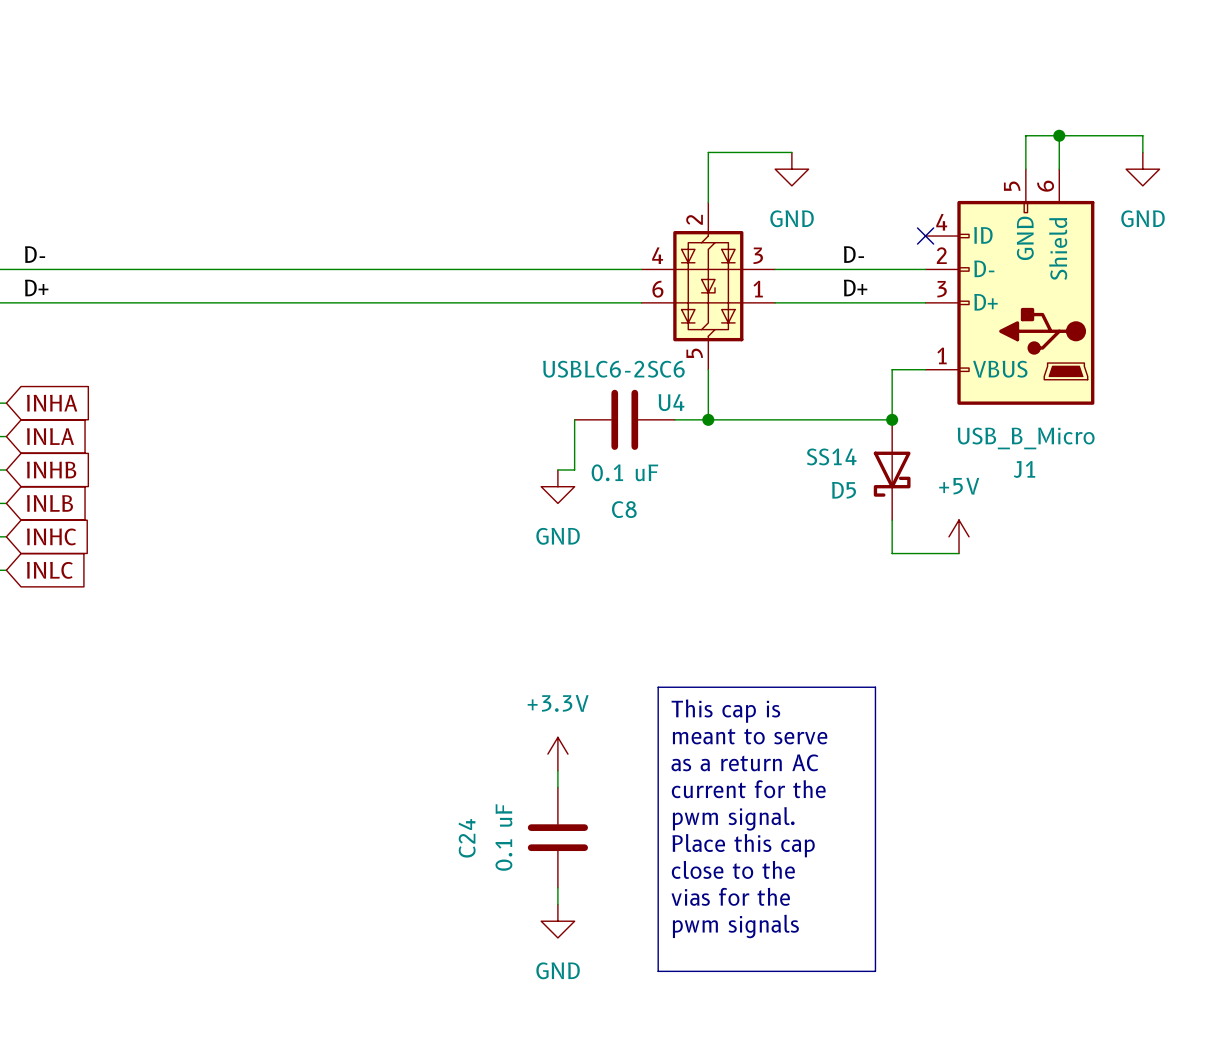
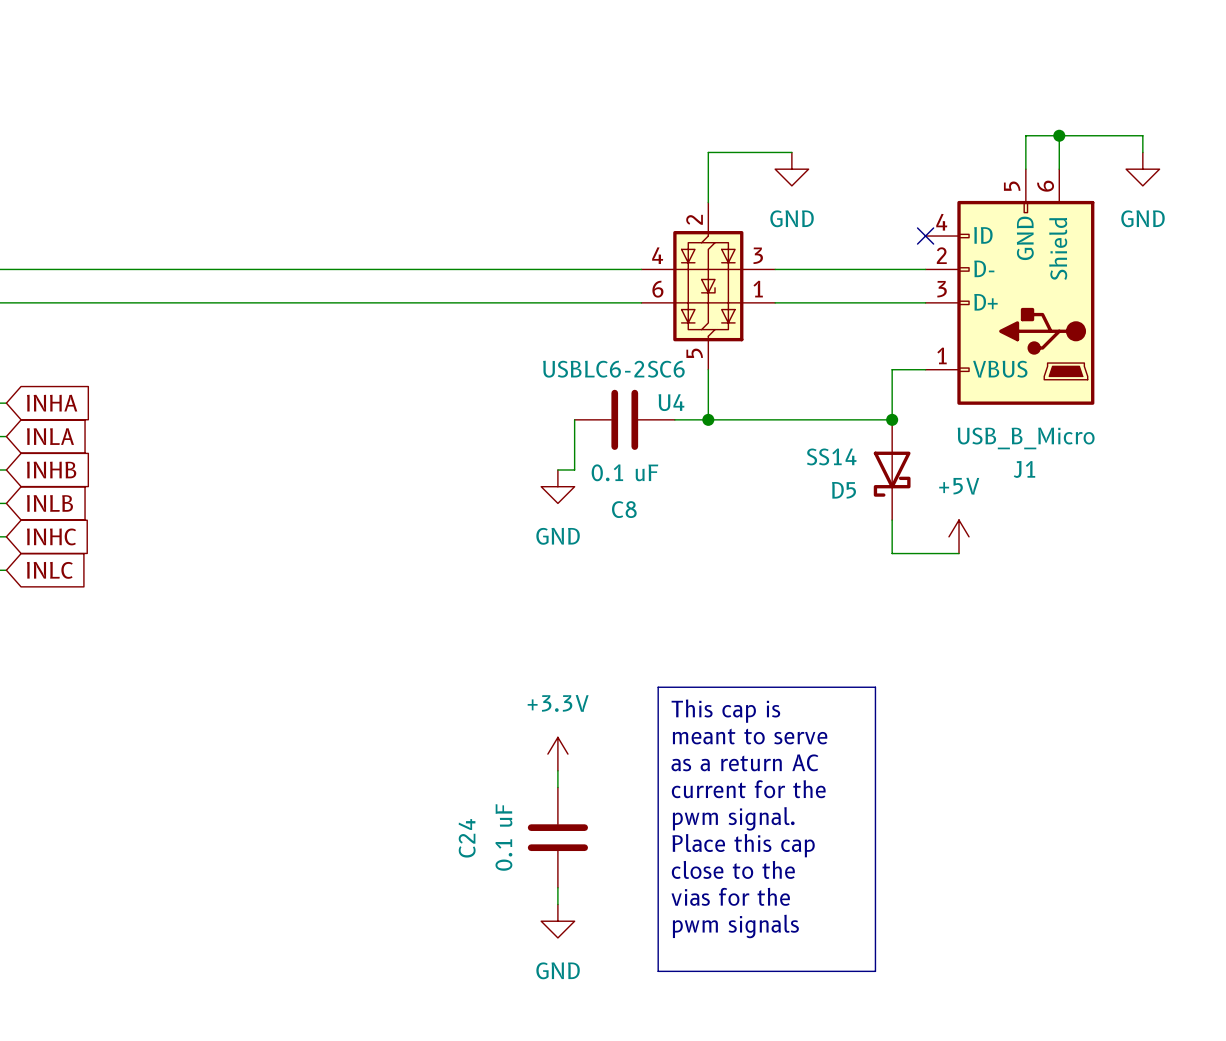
label: D- (35, 254) -> none
label: D- (853, 254) -> none
label: D+ (36, 288) -> none
label: D+ (855, 288) -> none

